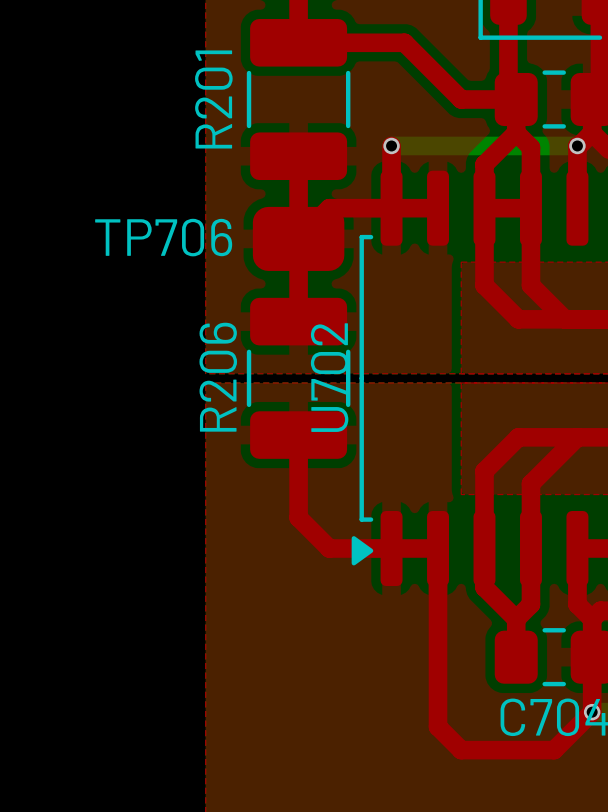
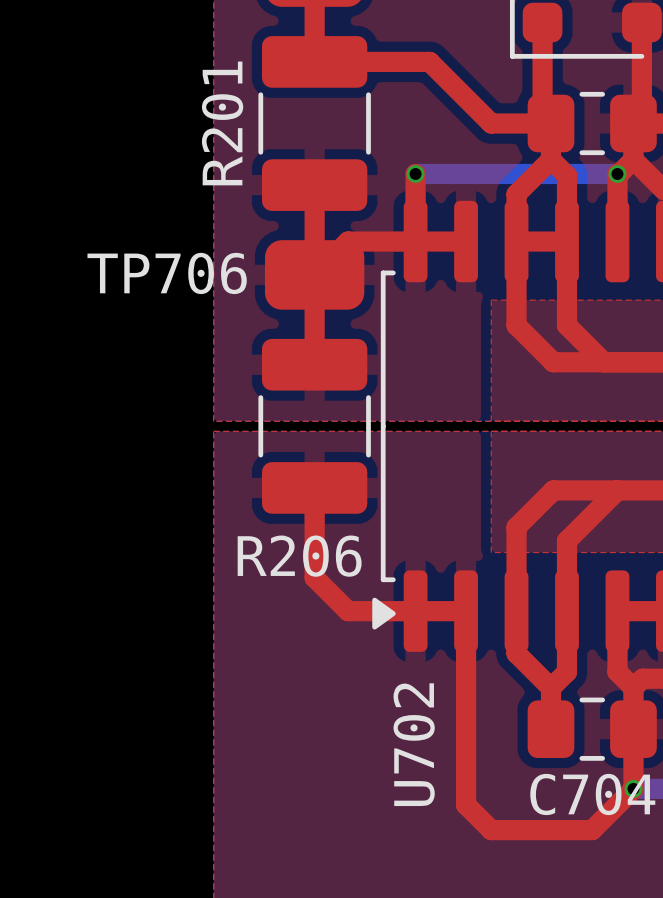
R206 name rotation: 0° (218, 377) -> 90° clockwise (299, 556)
U702 name position: U702 (329, 377) -> U702 (414, 744)

